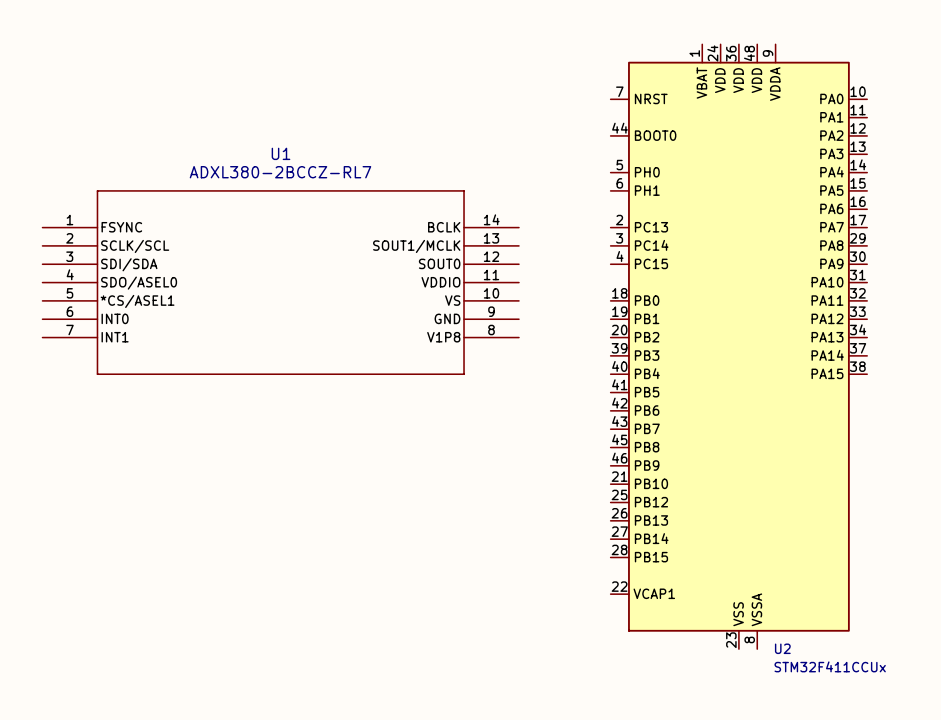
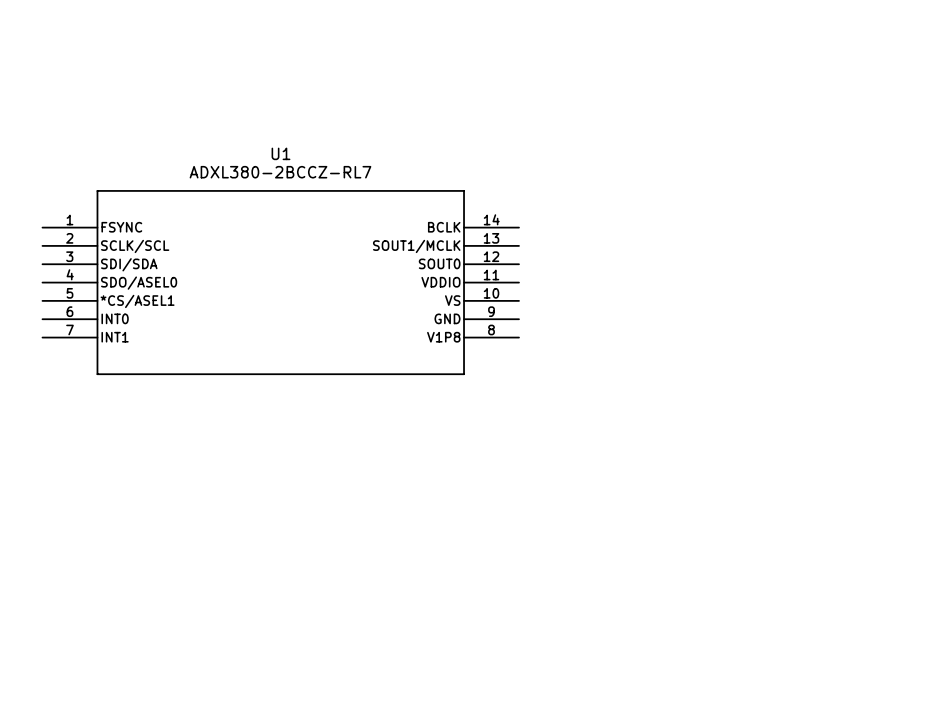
U2: STM32F411CCUx (738, 346) -> none

